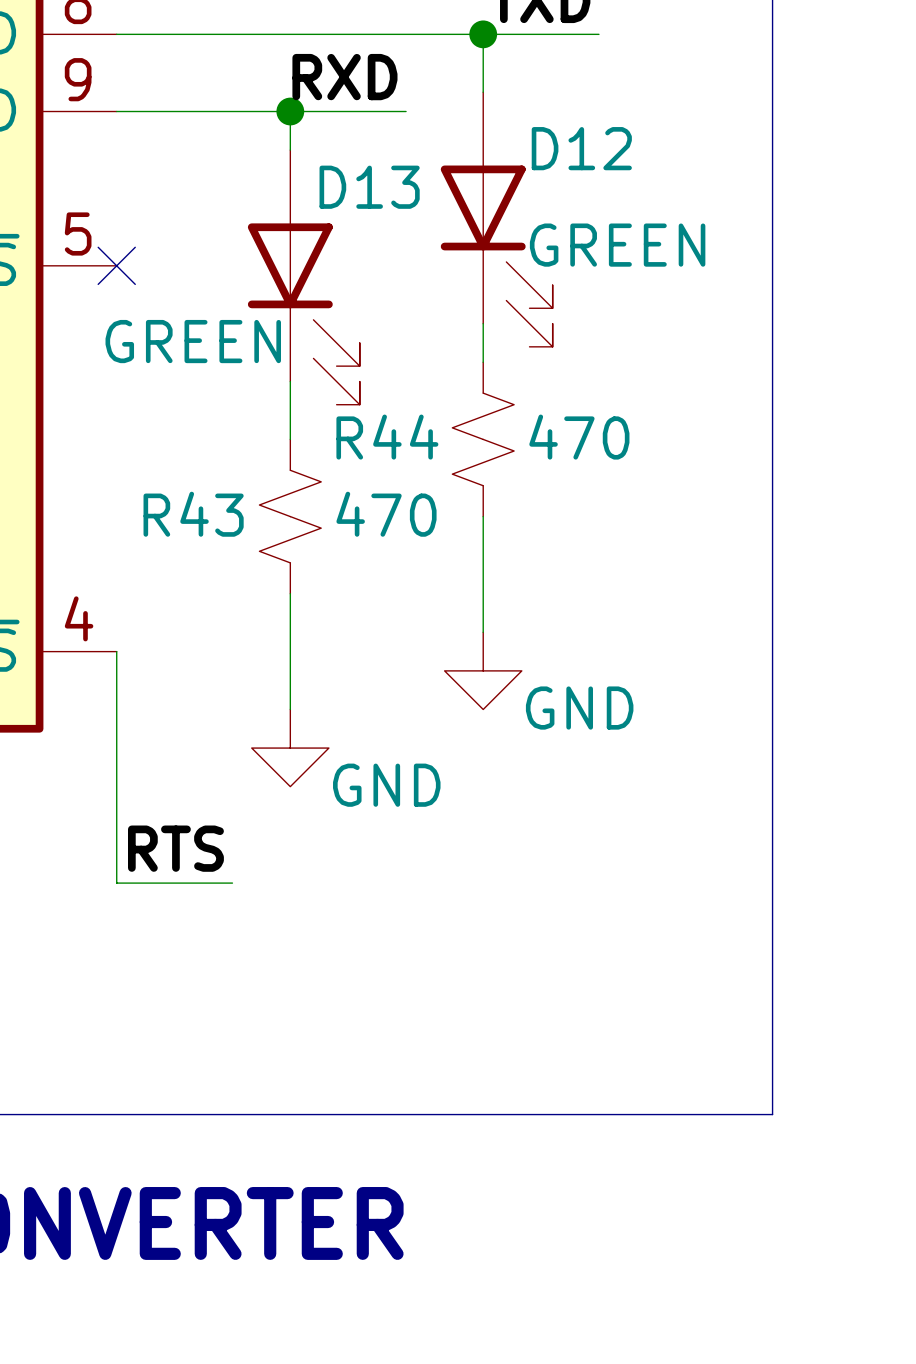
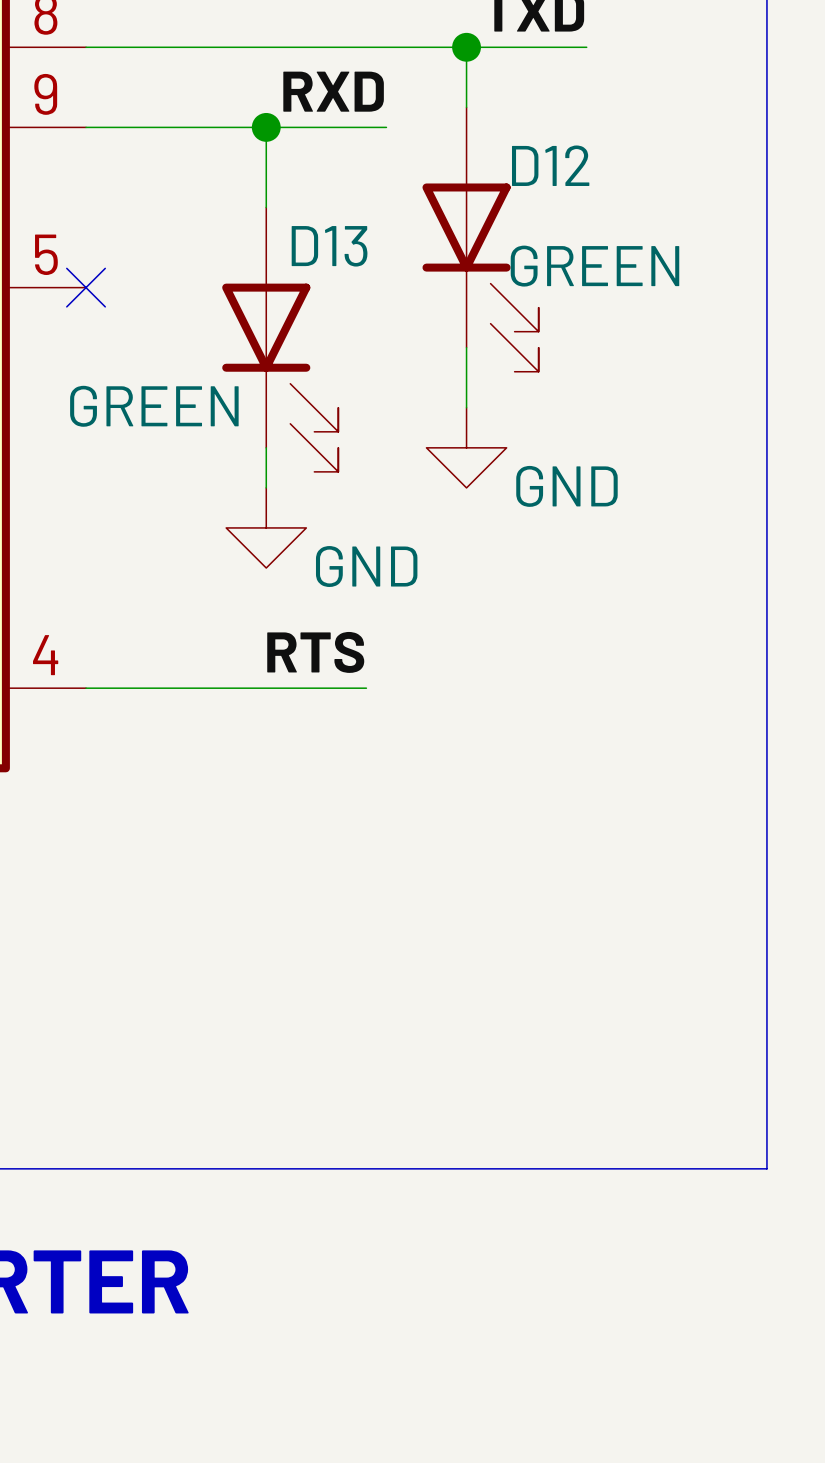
D13 position: (303, 277) -> (280, 339)
power symbol: none -> GND (466, 447)
R44: 470 (483, 439) -> none
power symbol: none -> GND (266, 527)
R43: 470 (290, 516) -> none
wire: (483, 516) (483, 632) -> none
wire: (290, 593) (290, 709) -> none
wire: (116, 651) (116, 883) (232, 883) -> (86, 688) (366, 688)
power symbol: GND (483, 670) -> none
power symbol: GND (290, 748) -> none
label position: RTS (175, 848) -> RTS (315, 652)

